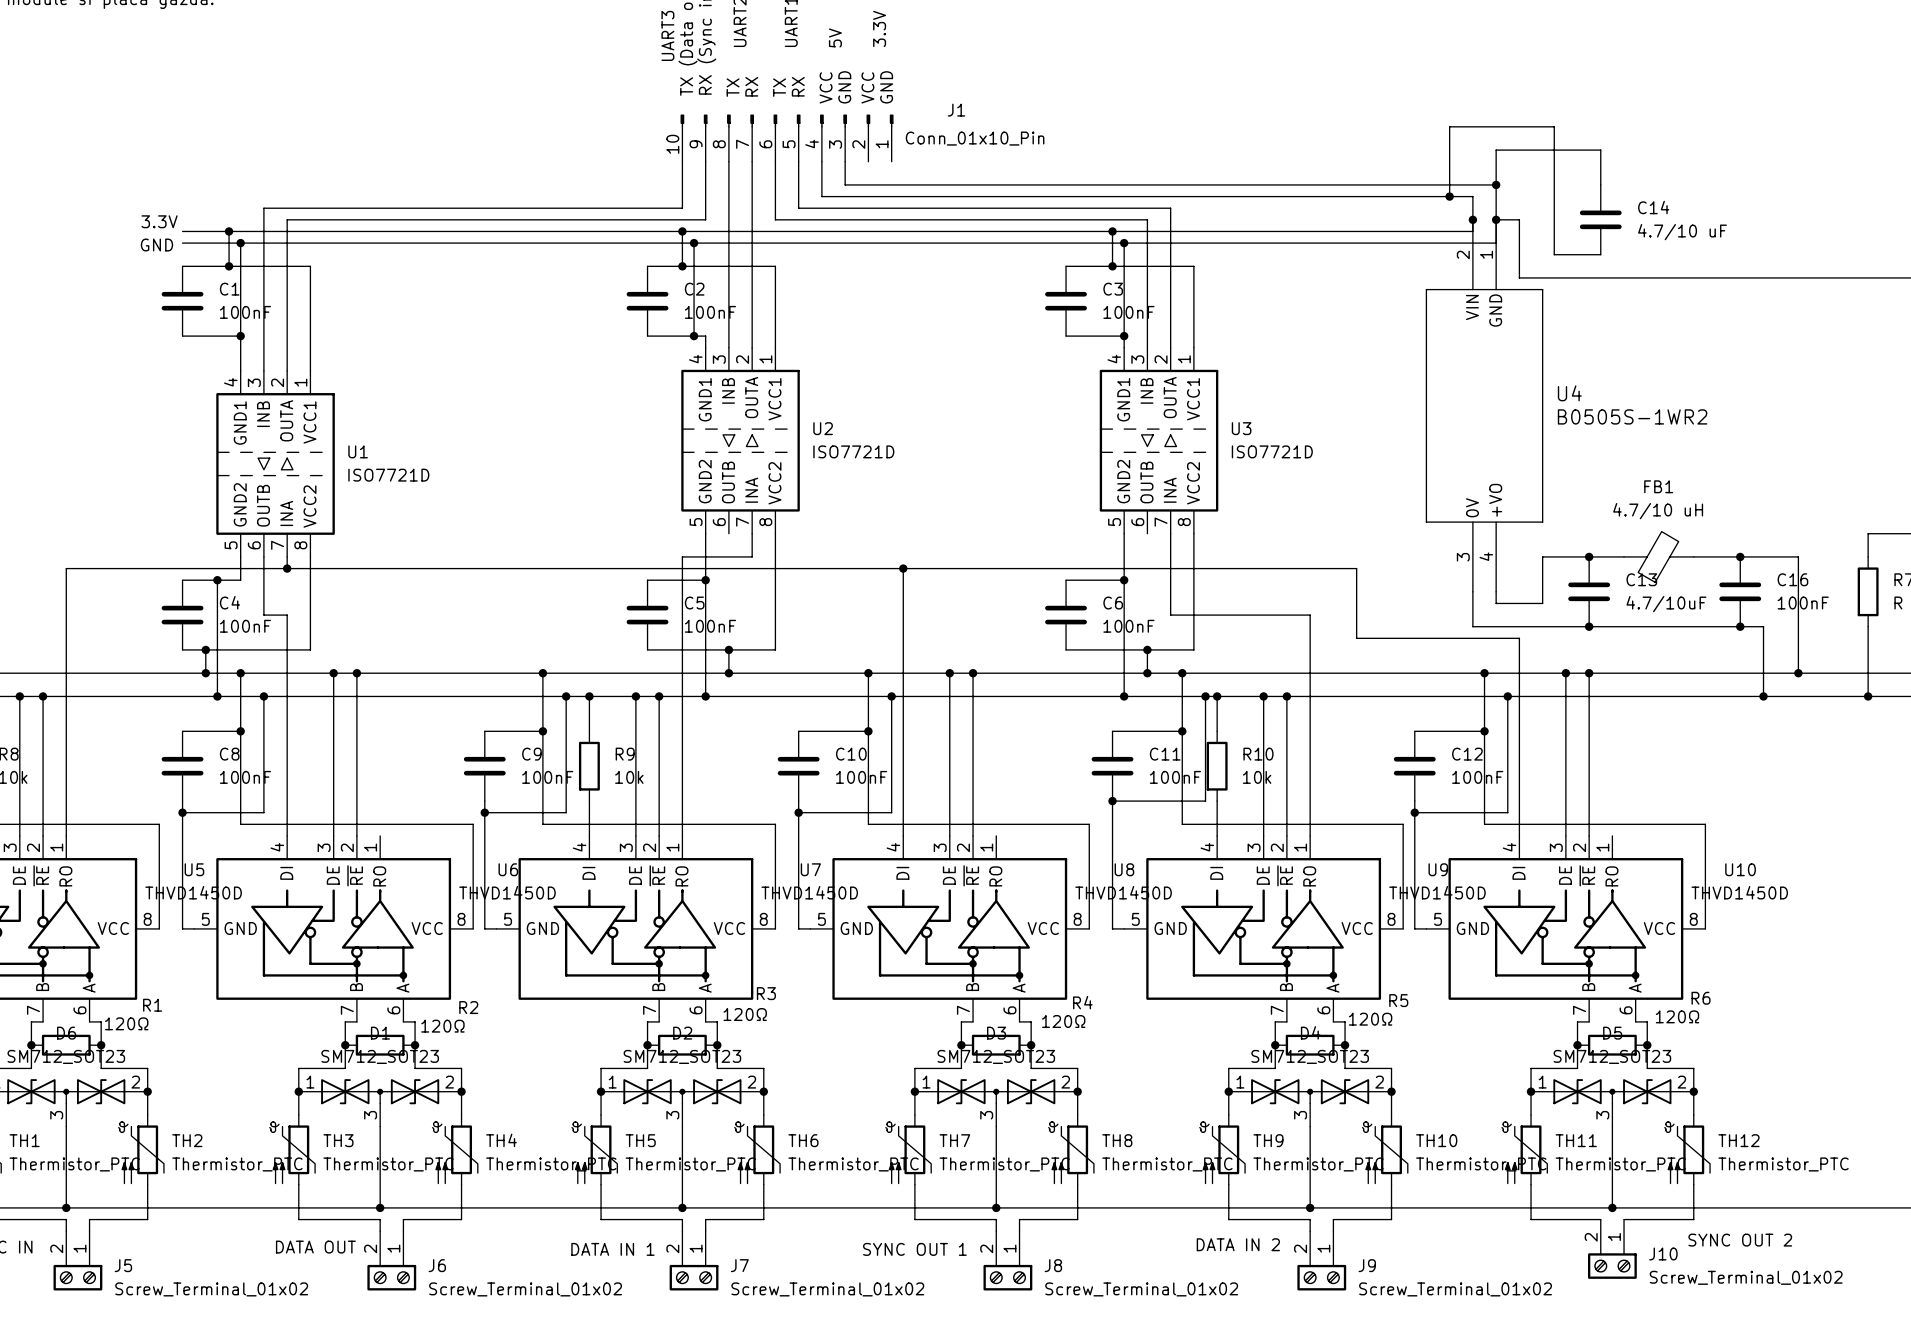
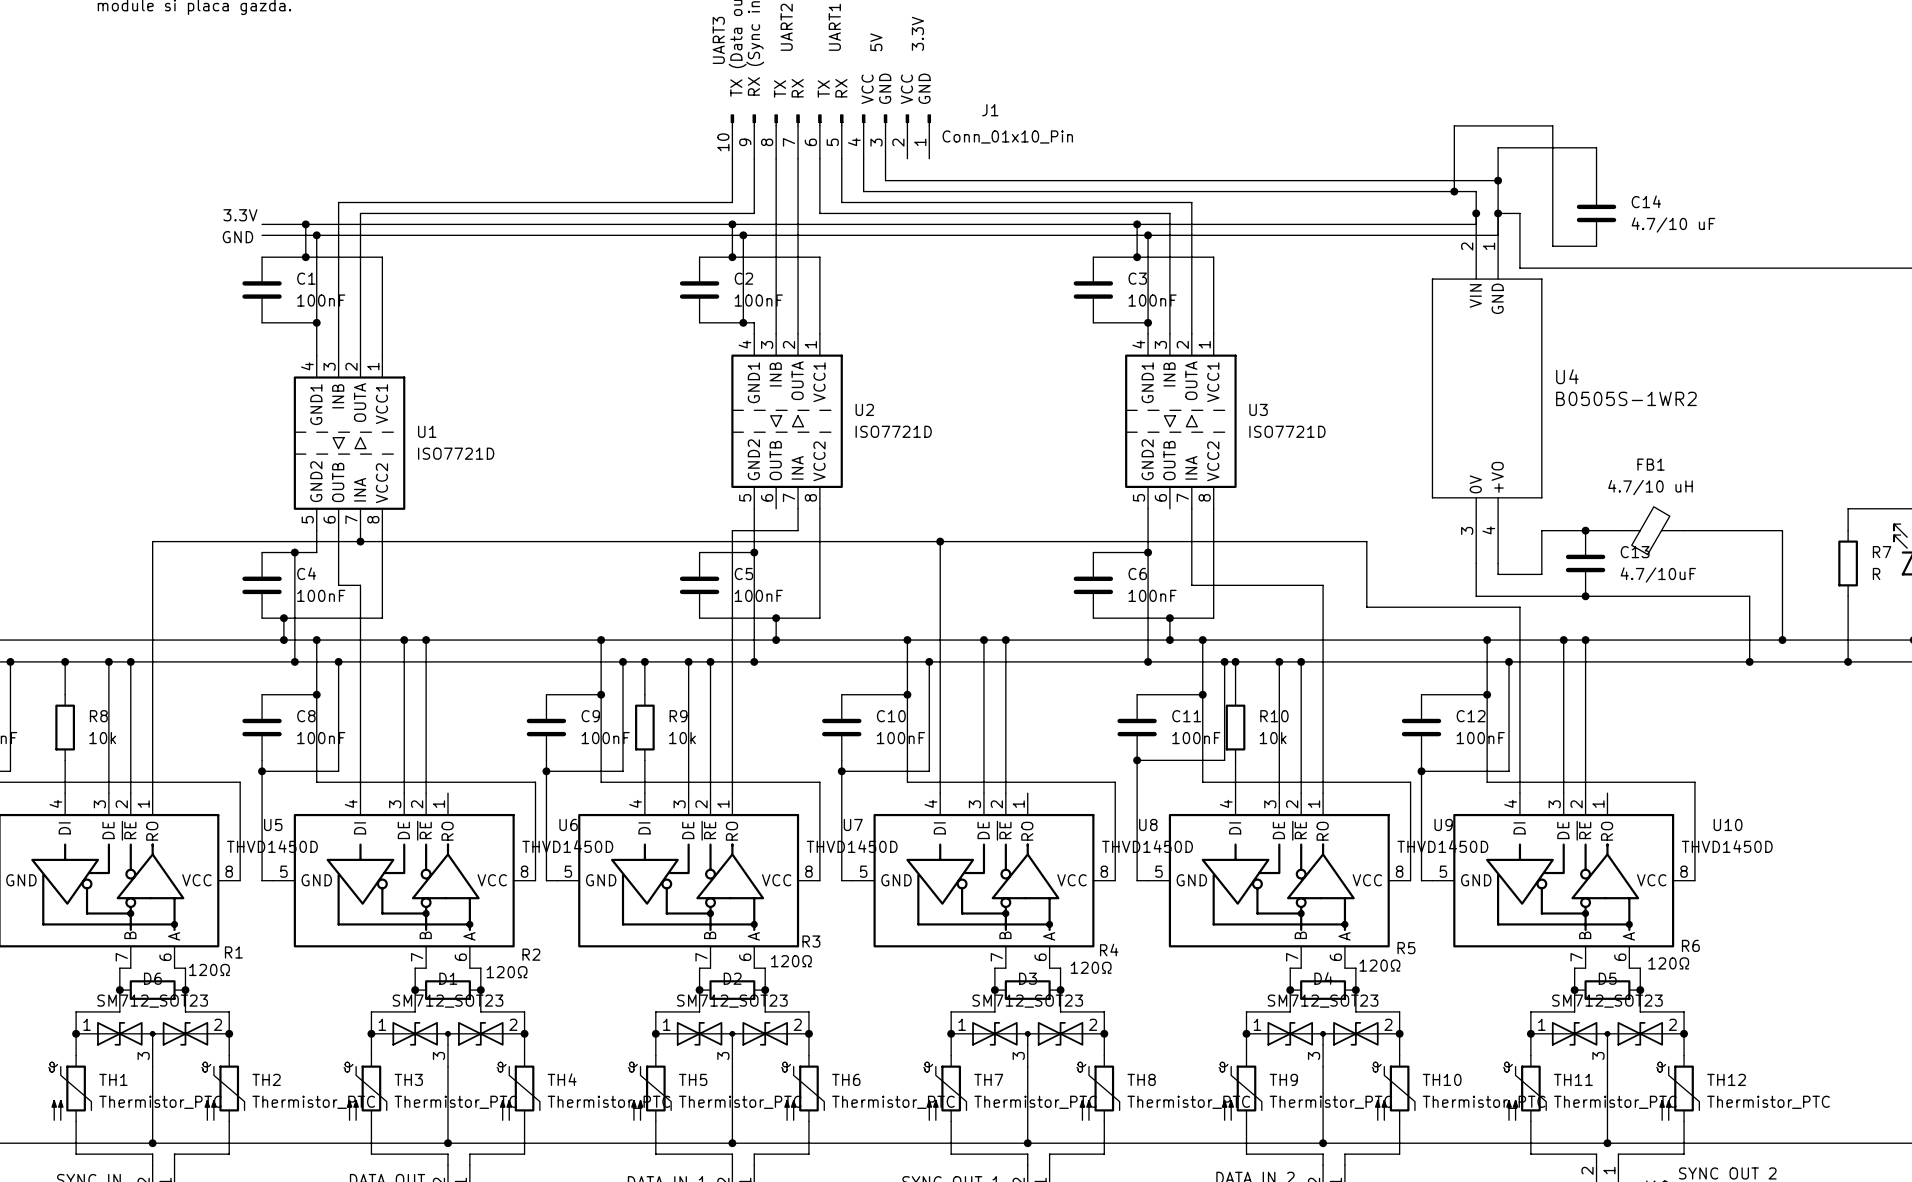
junction: (1740, 556) -> none
C16: 100nF (1740, 591) -> none
junction: (1740, 626) -> none

